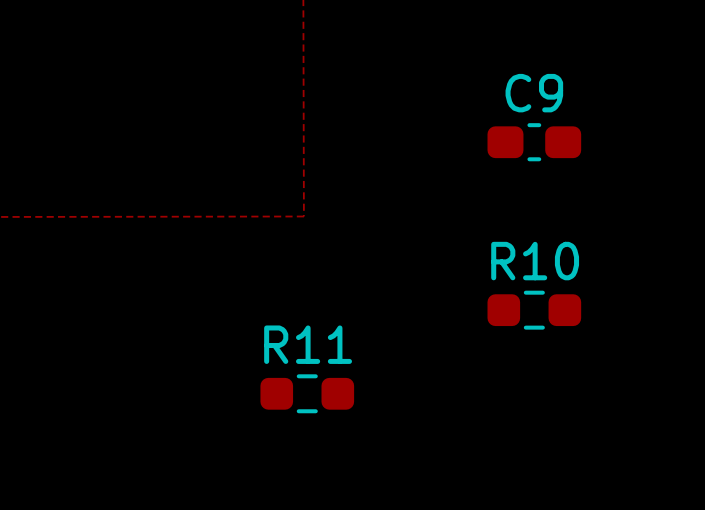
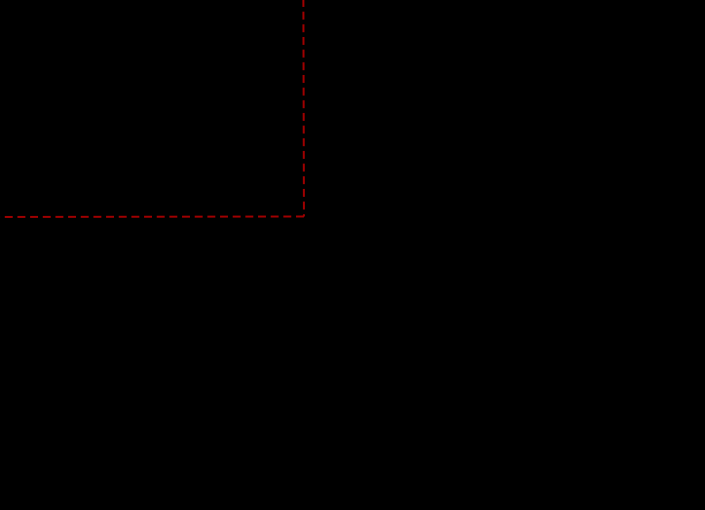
C9: (534, 142) -> none
R10: (534, 310) -> none
R11: (307, 393) -> none

